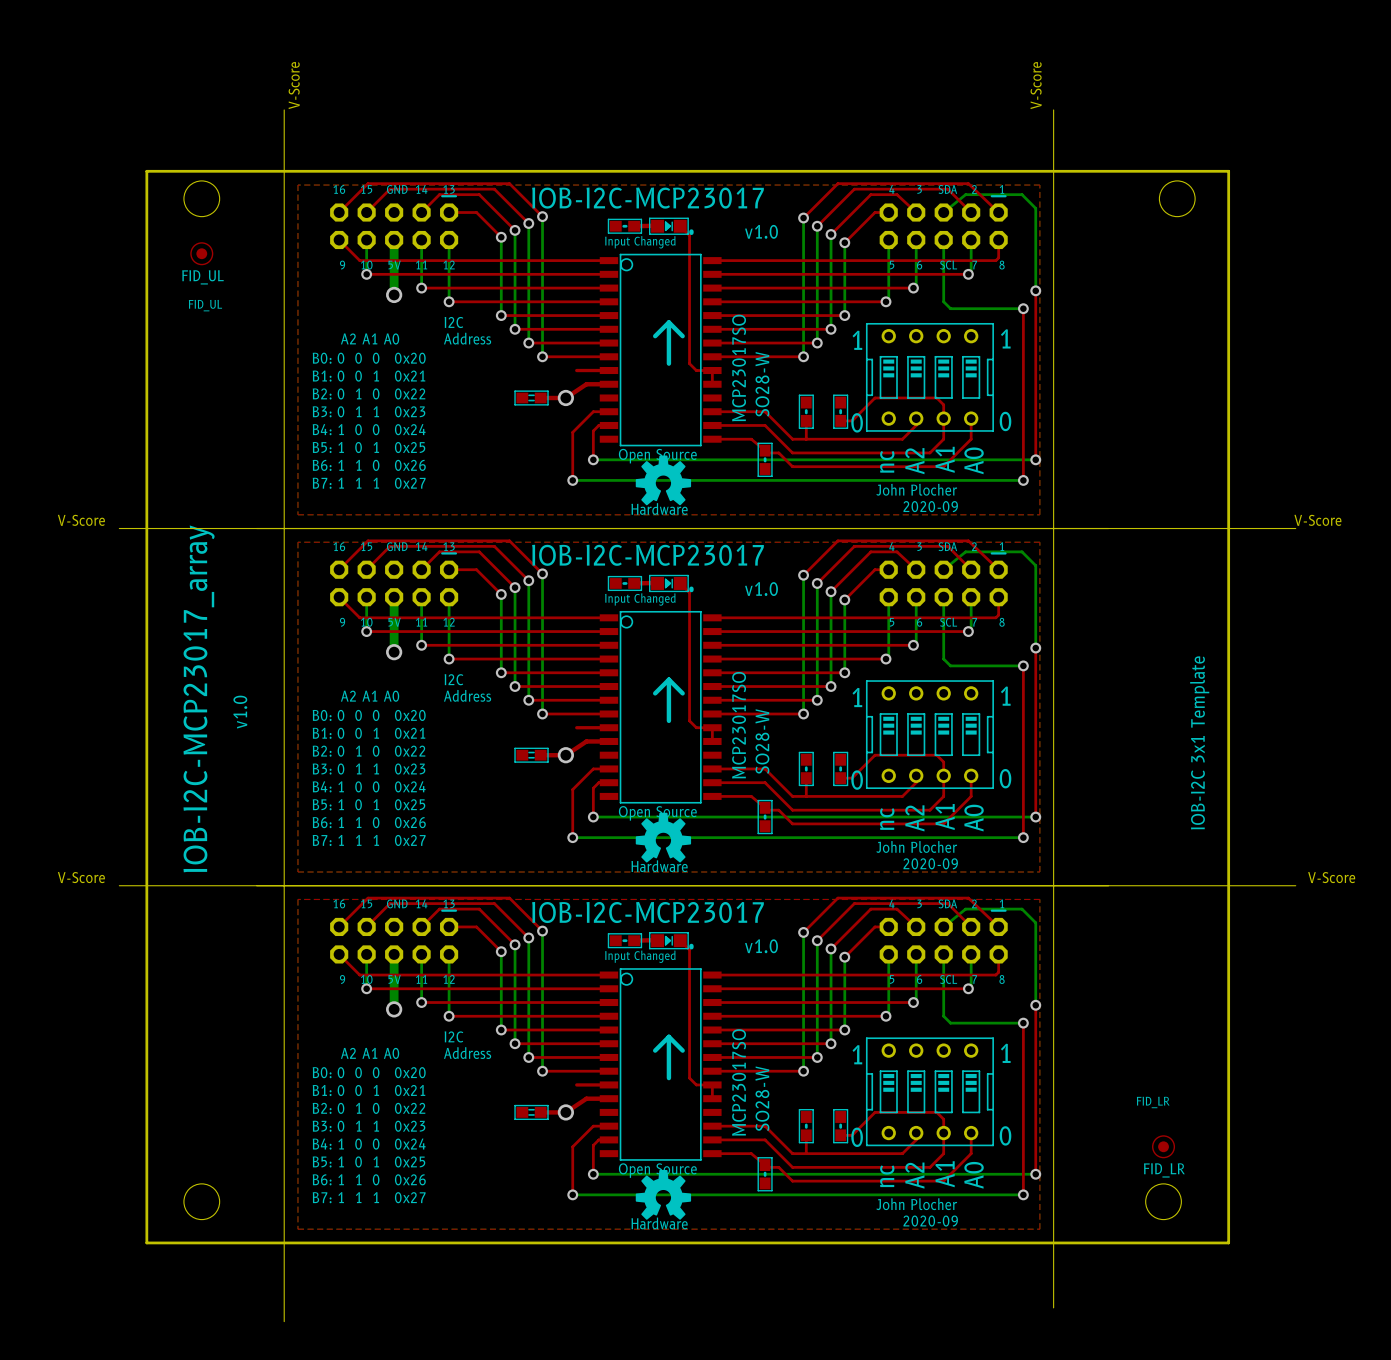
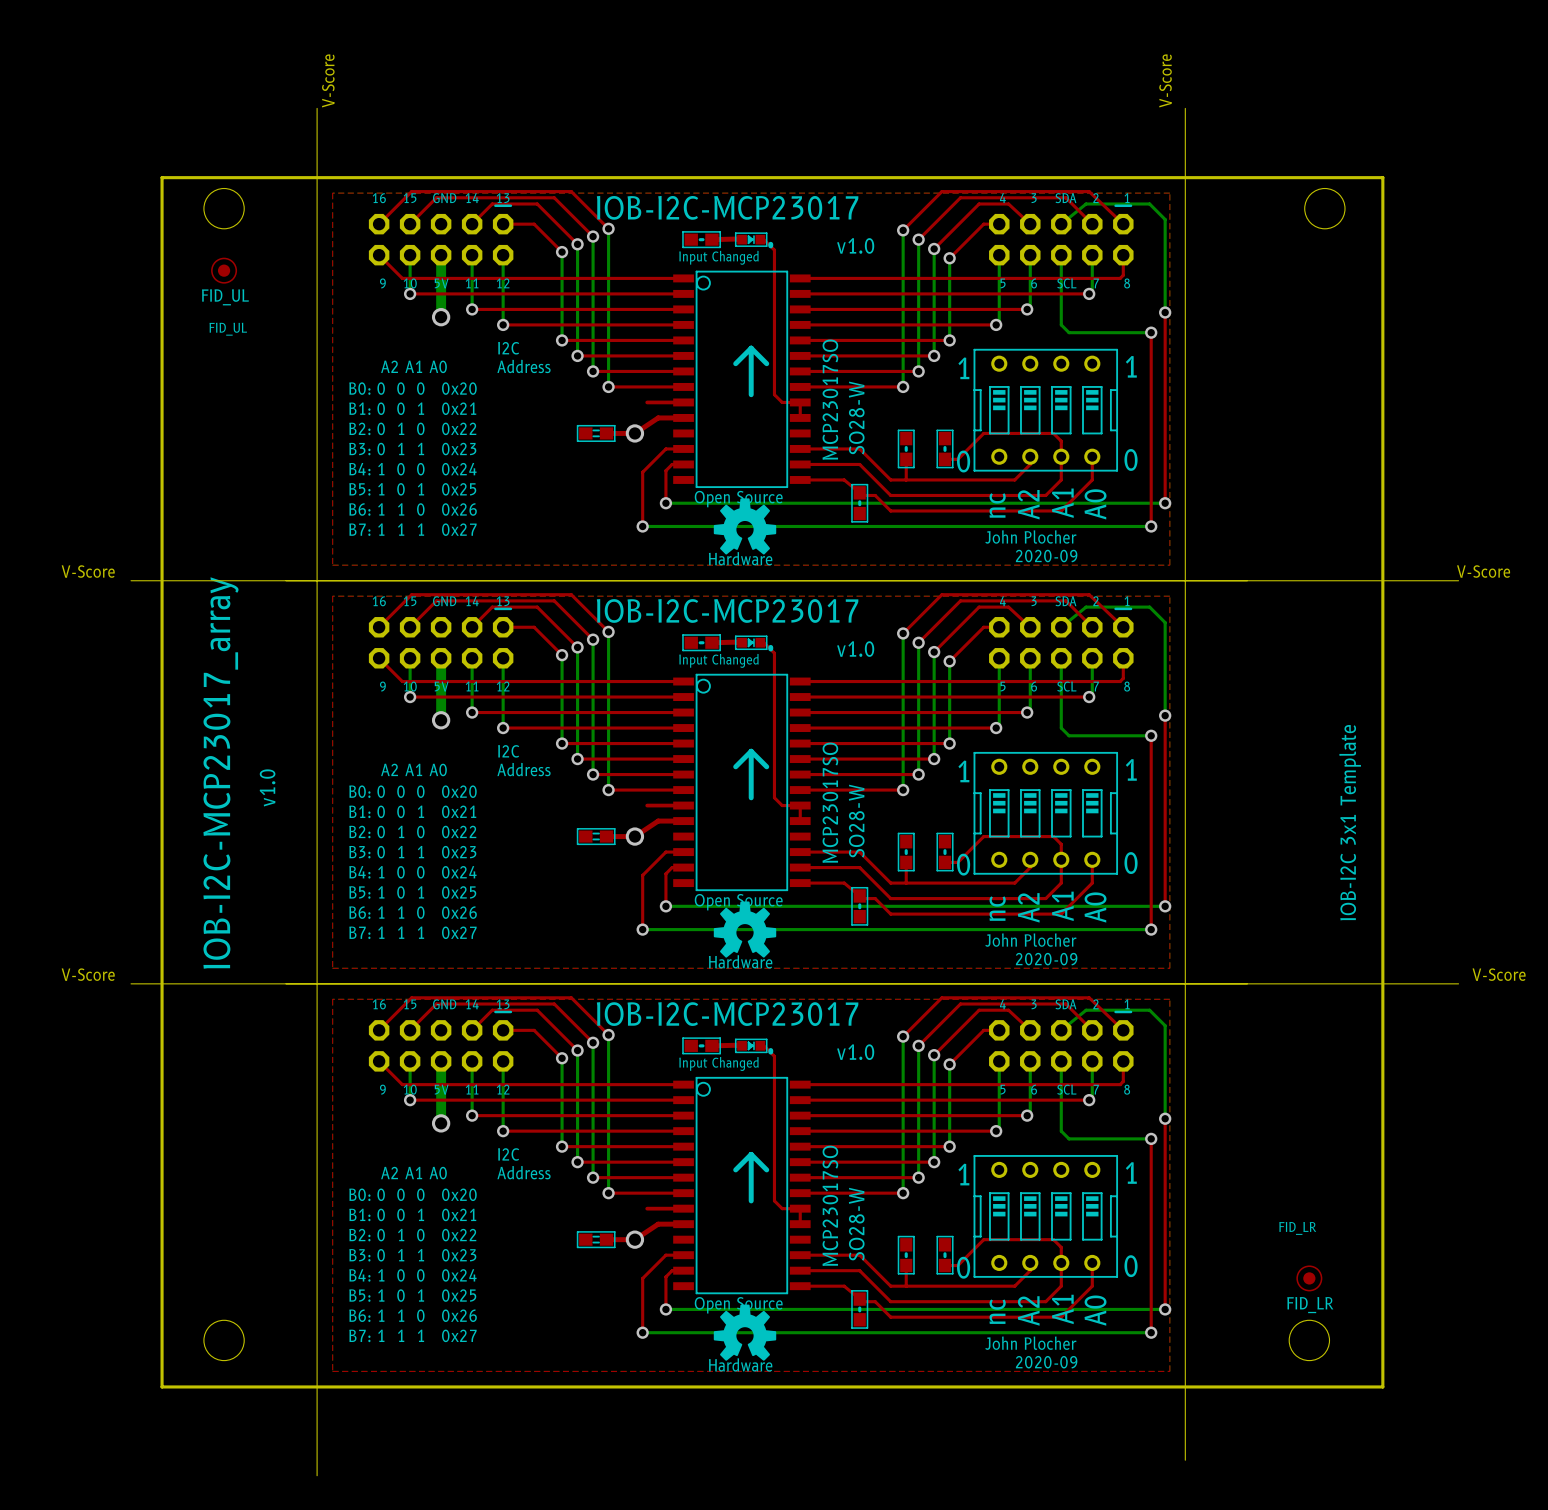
part footprint: [648, 217, 694, 236] -> [734, 232, 774, 249]
part footprint: [648, 574, 694, 593] -> [734, 635, 774, 652]
part footprint: [648, 932, 694, 950] -> [734, 1038, 774, 1055]

